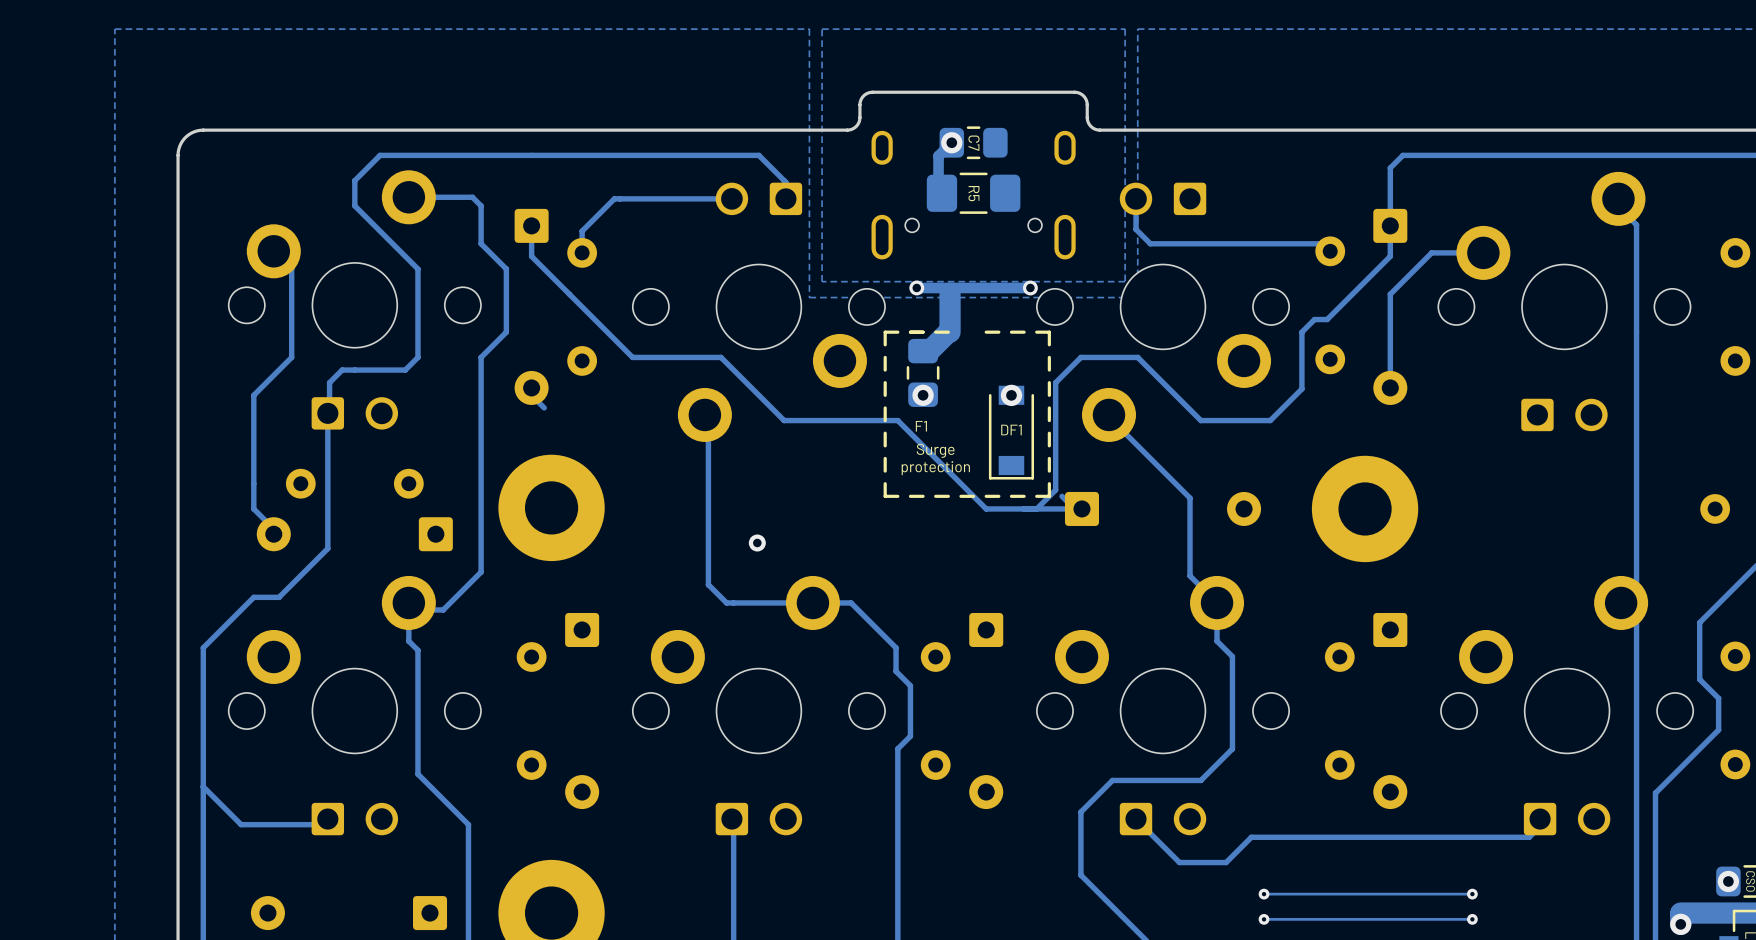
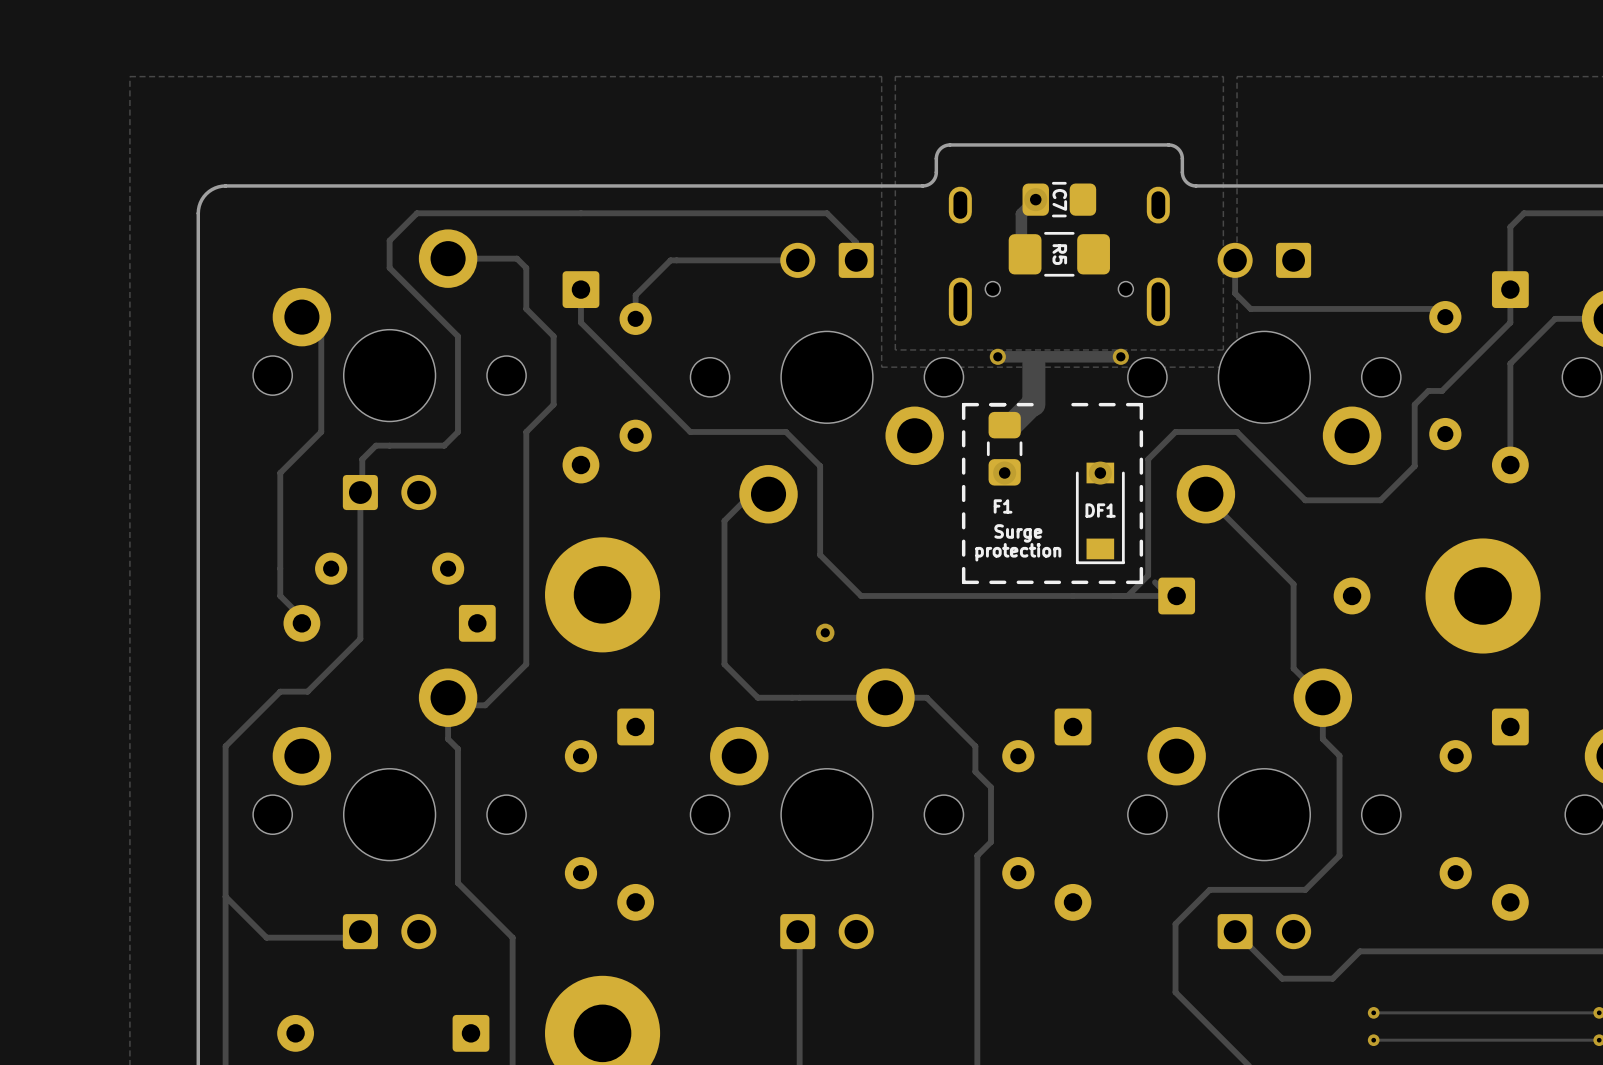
track: (752, 389) (784, 420) (897, 420) (986, 508) -> (820, 466) (820, 554) (861, 595) (1073, 595)
track: (531, 395) (544, 407) -> none
track: (708, 420) (708, 584) (726, 602) -> (765, 500) (744, 500) (724, 520) (724, 664) (757, 697) (792, 697)

